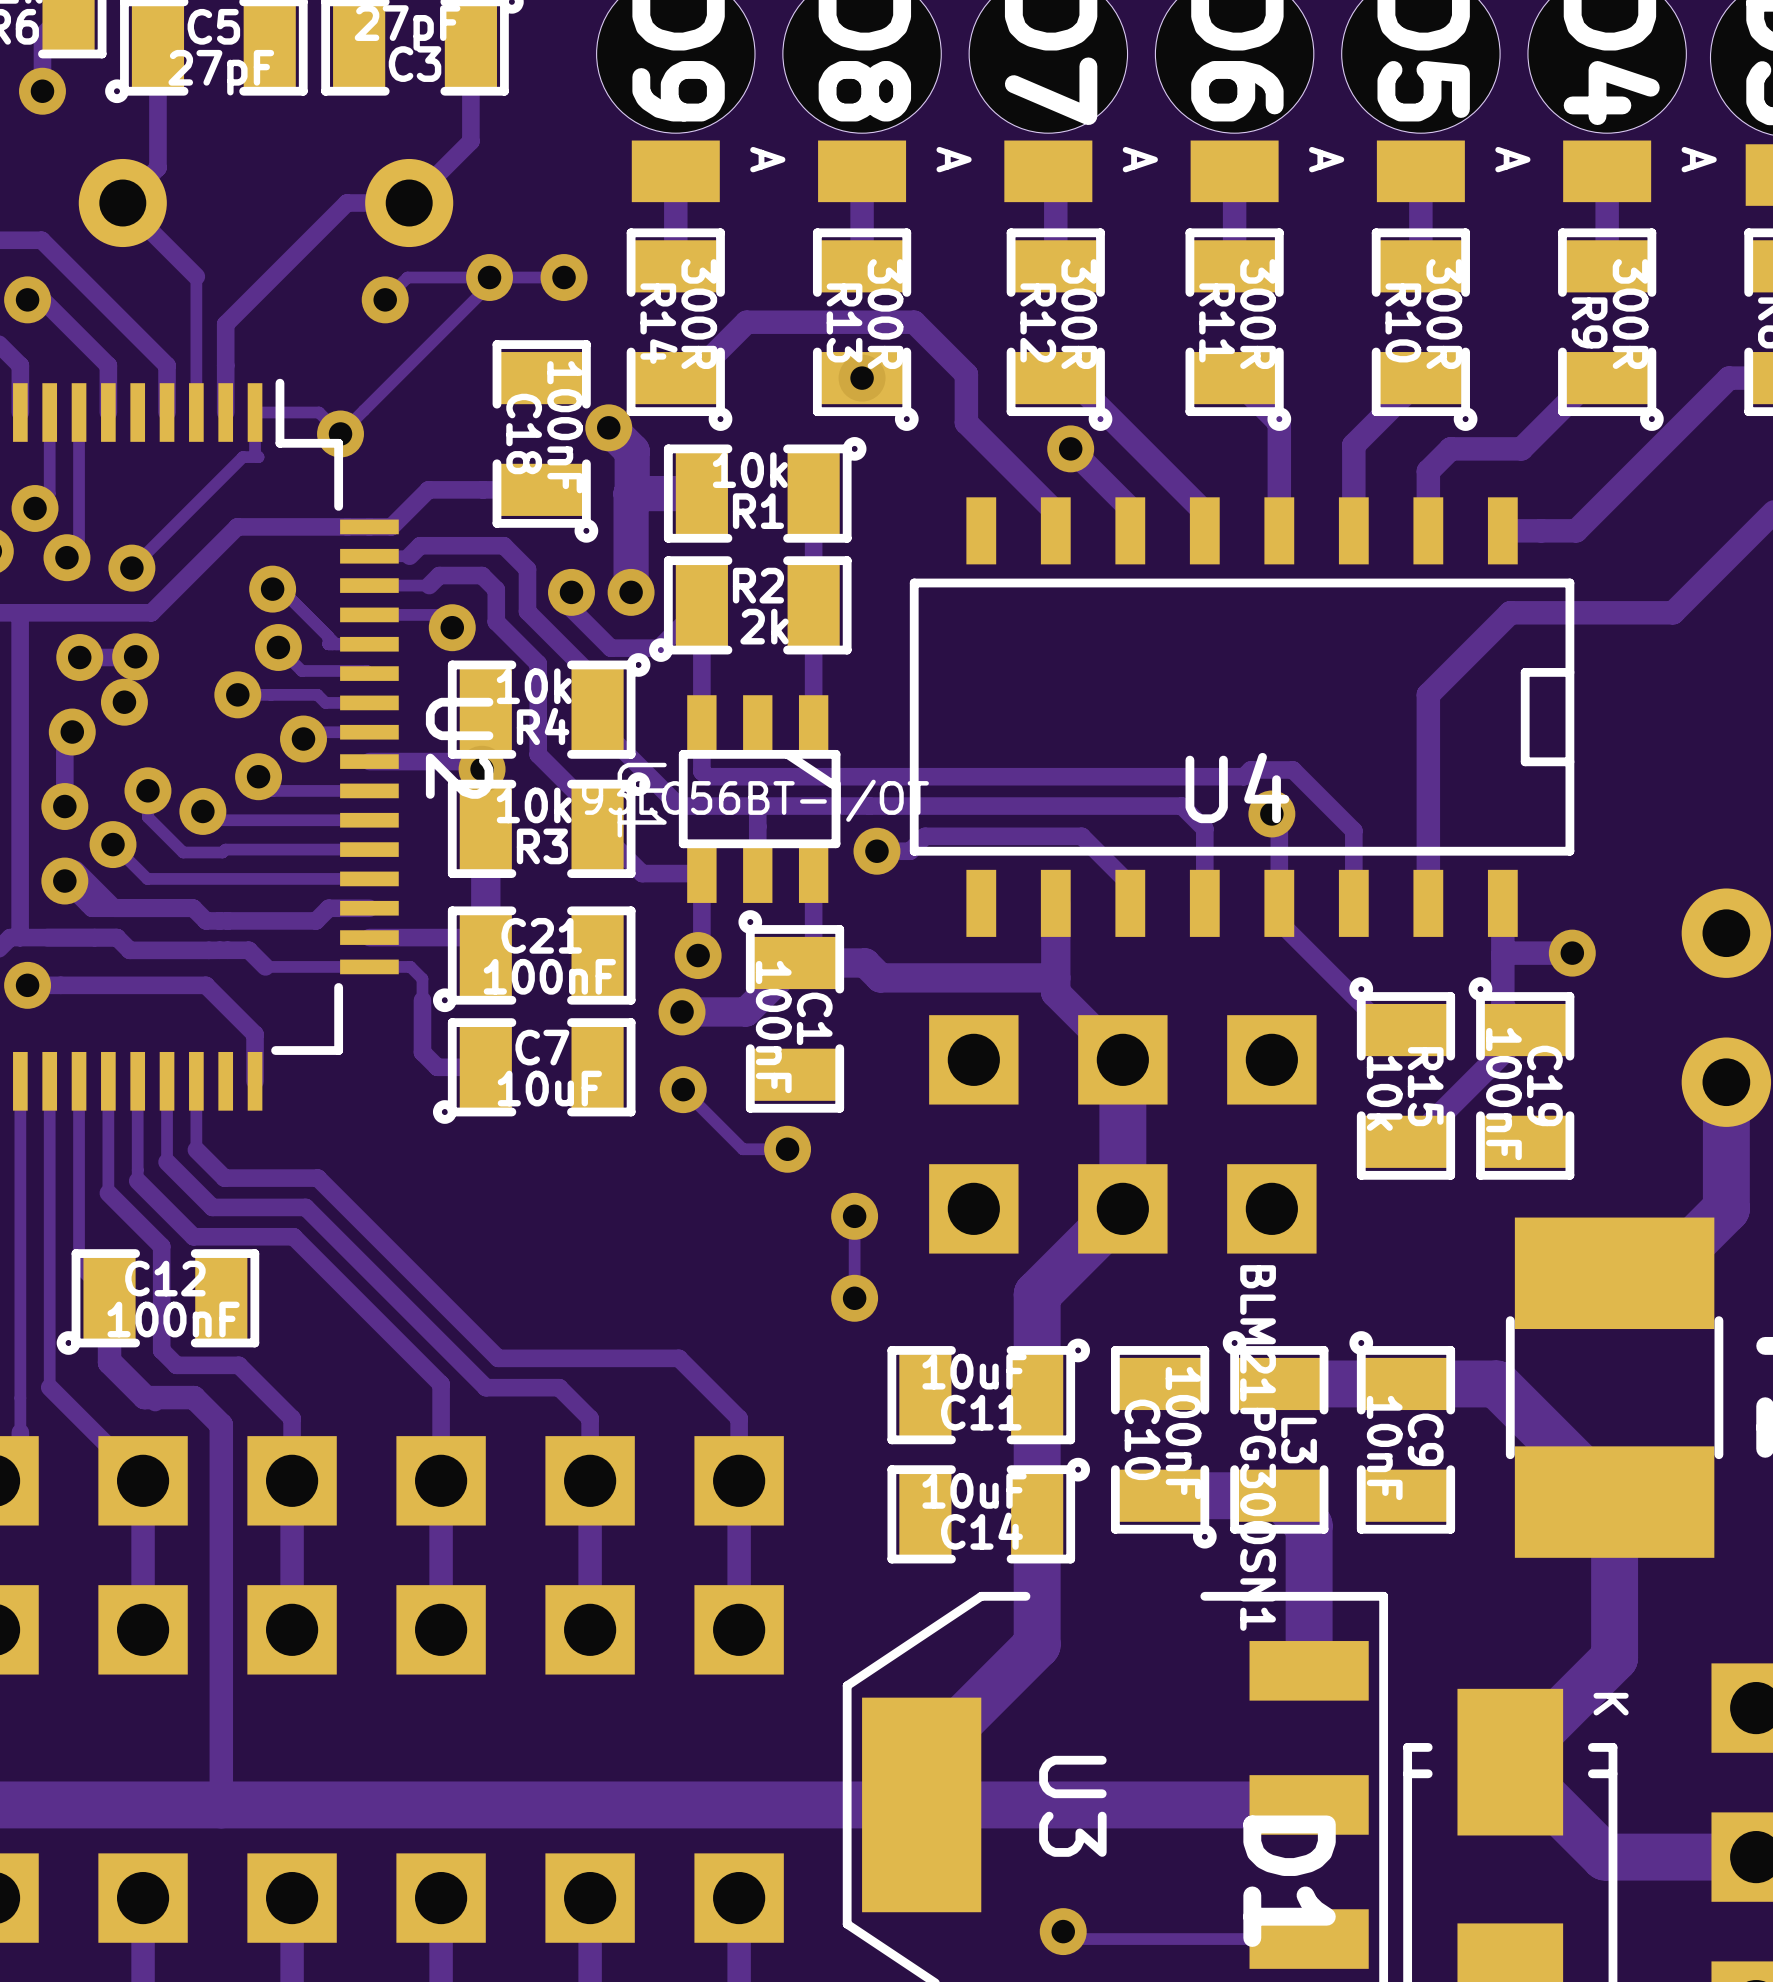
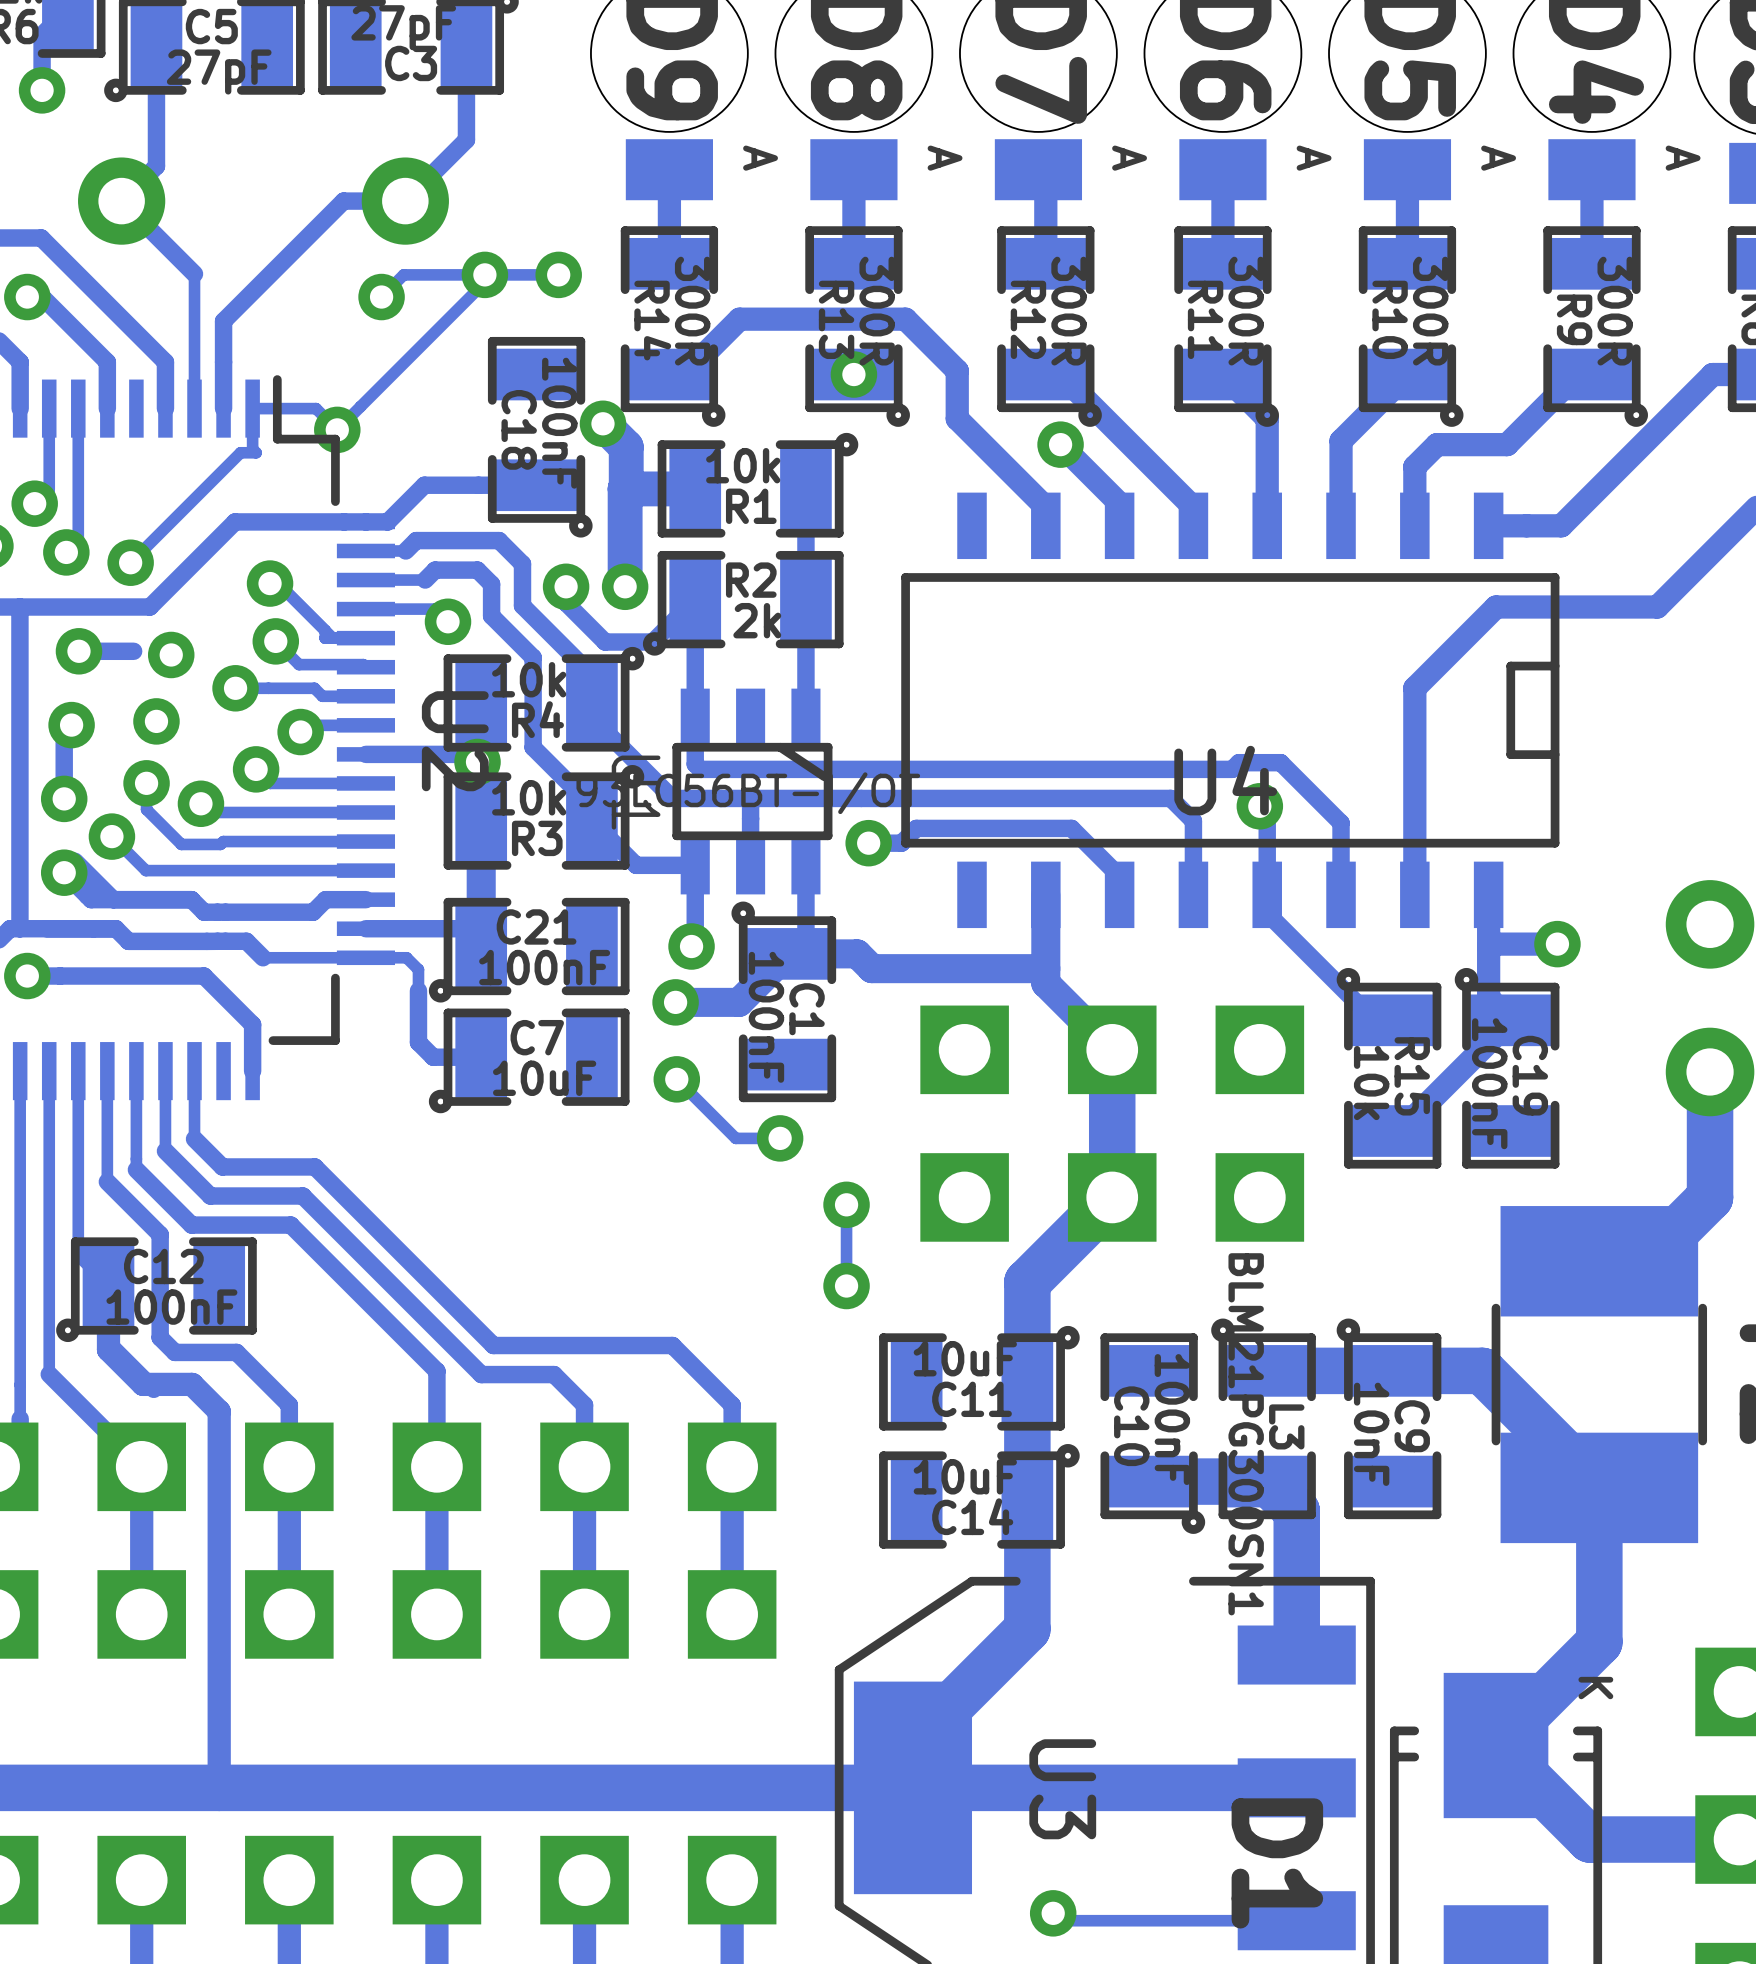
via position: (135, 656) -> (171, 654)
via position: (124, 702) -> (156, 721)

